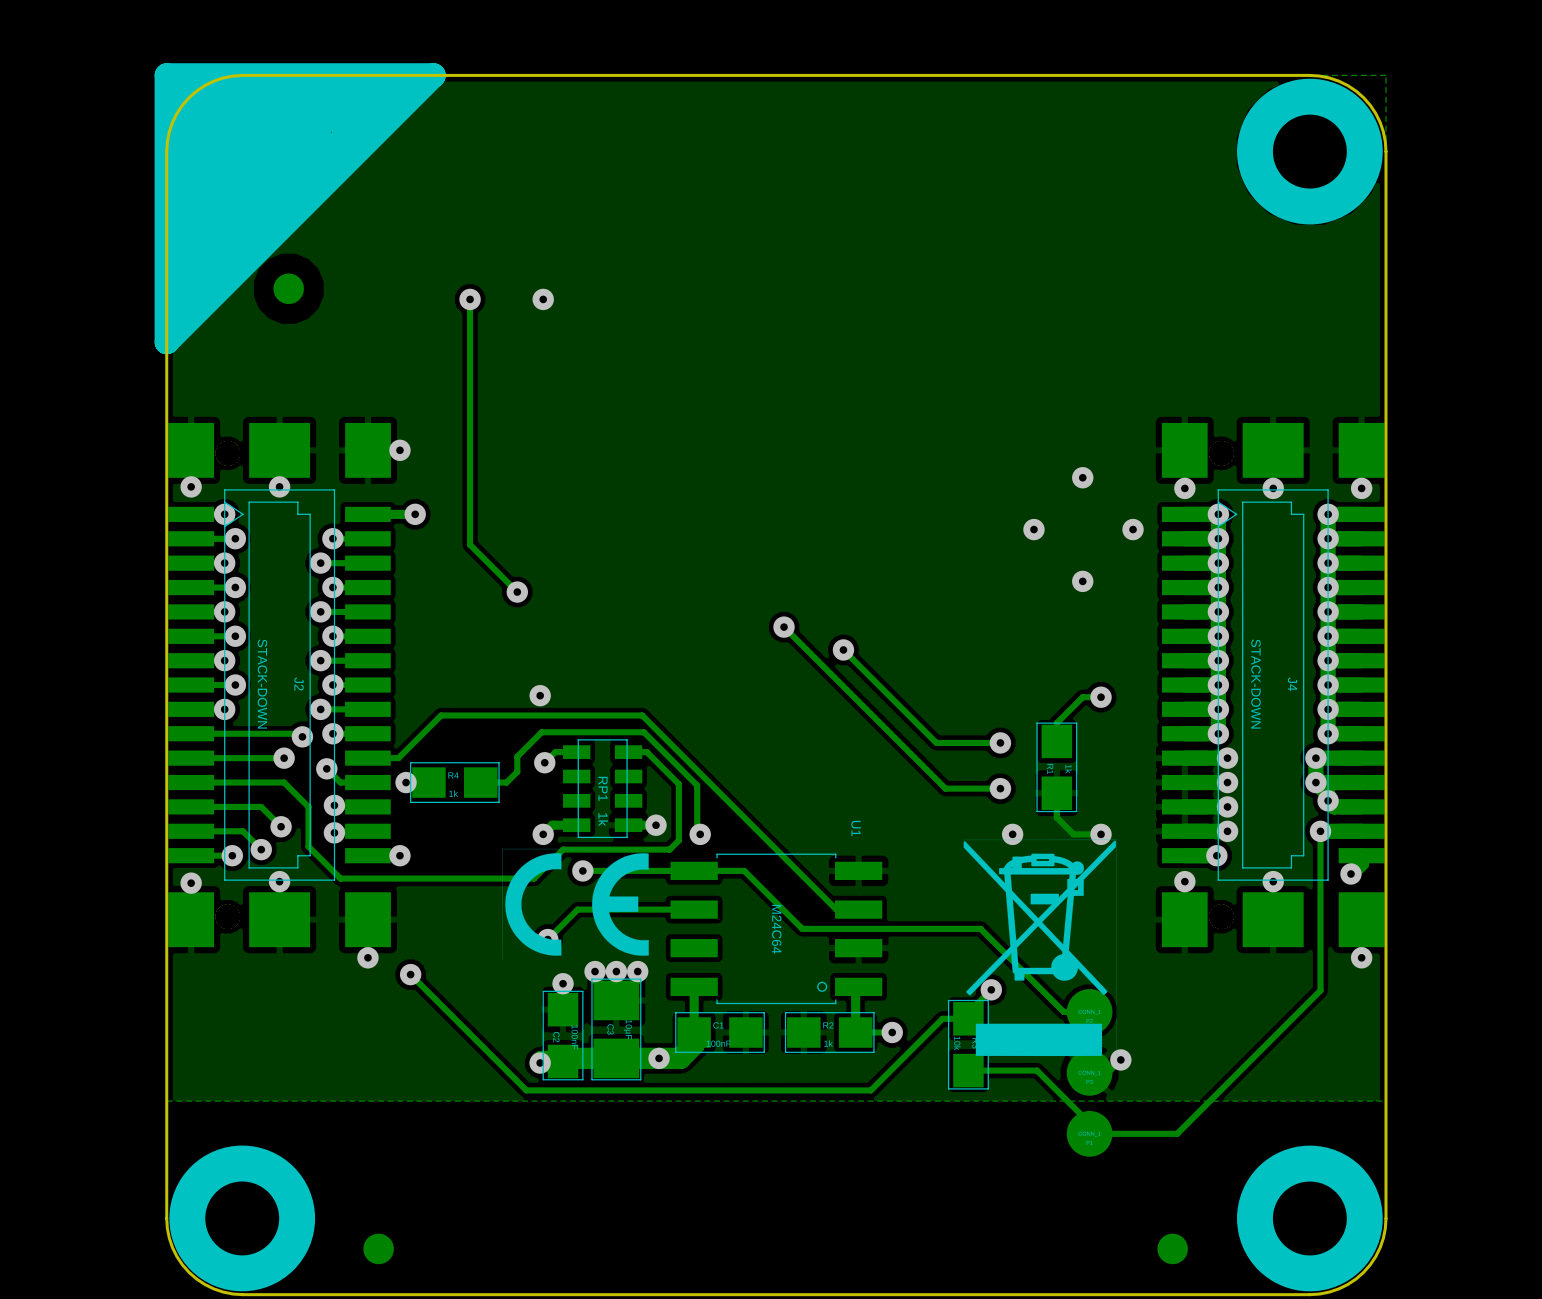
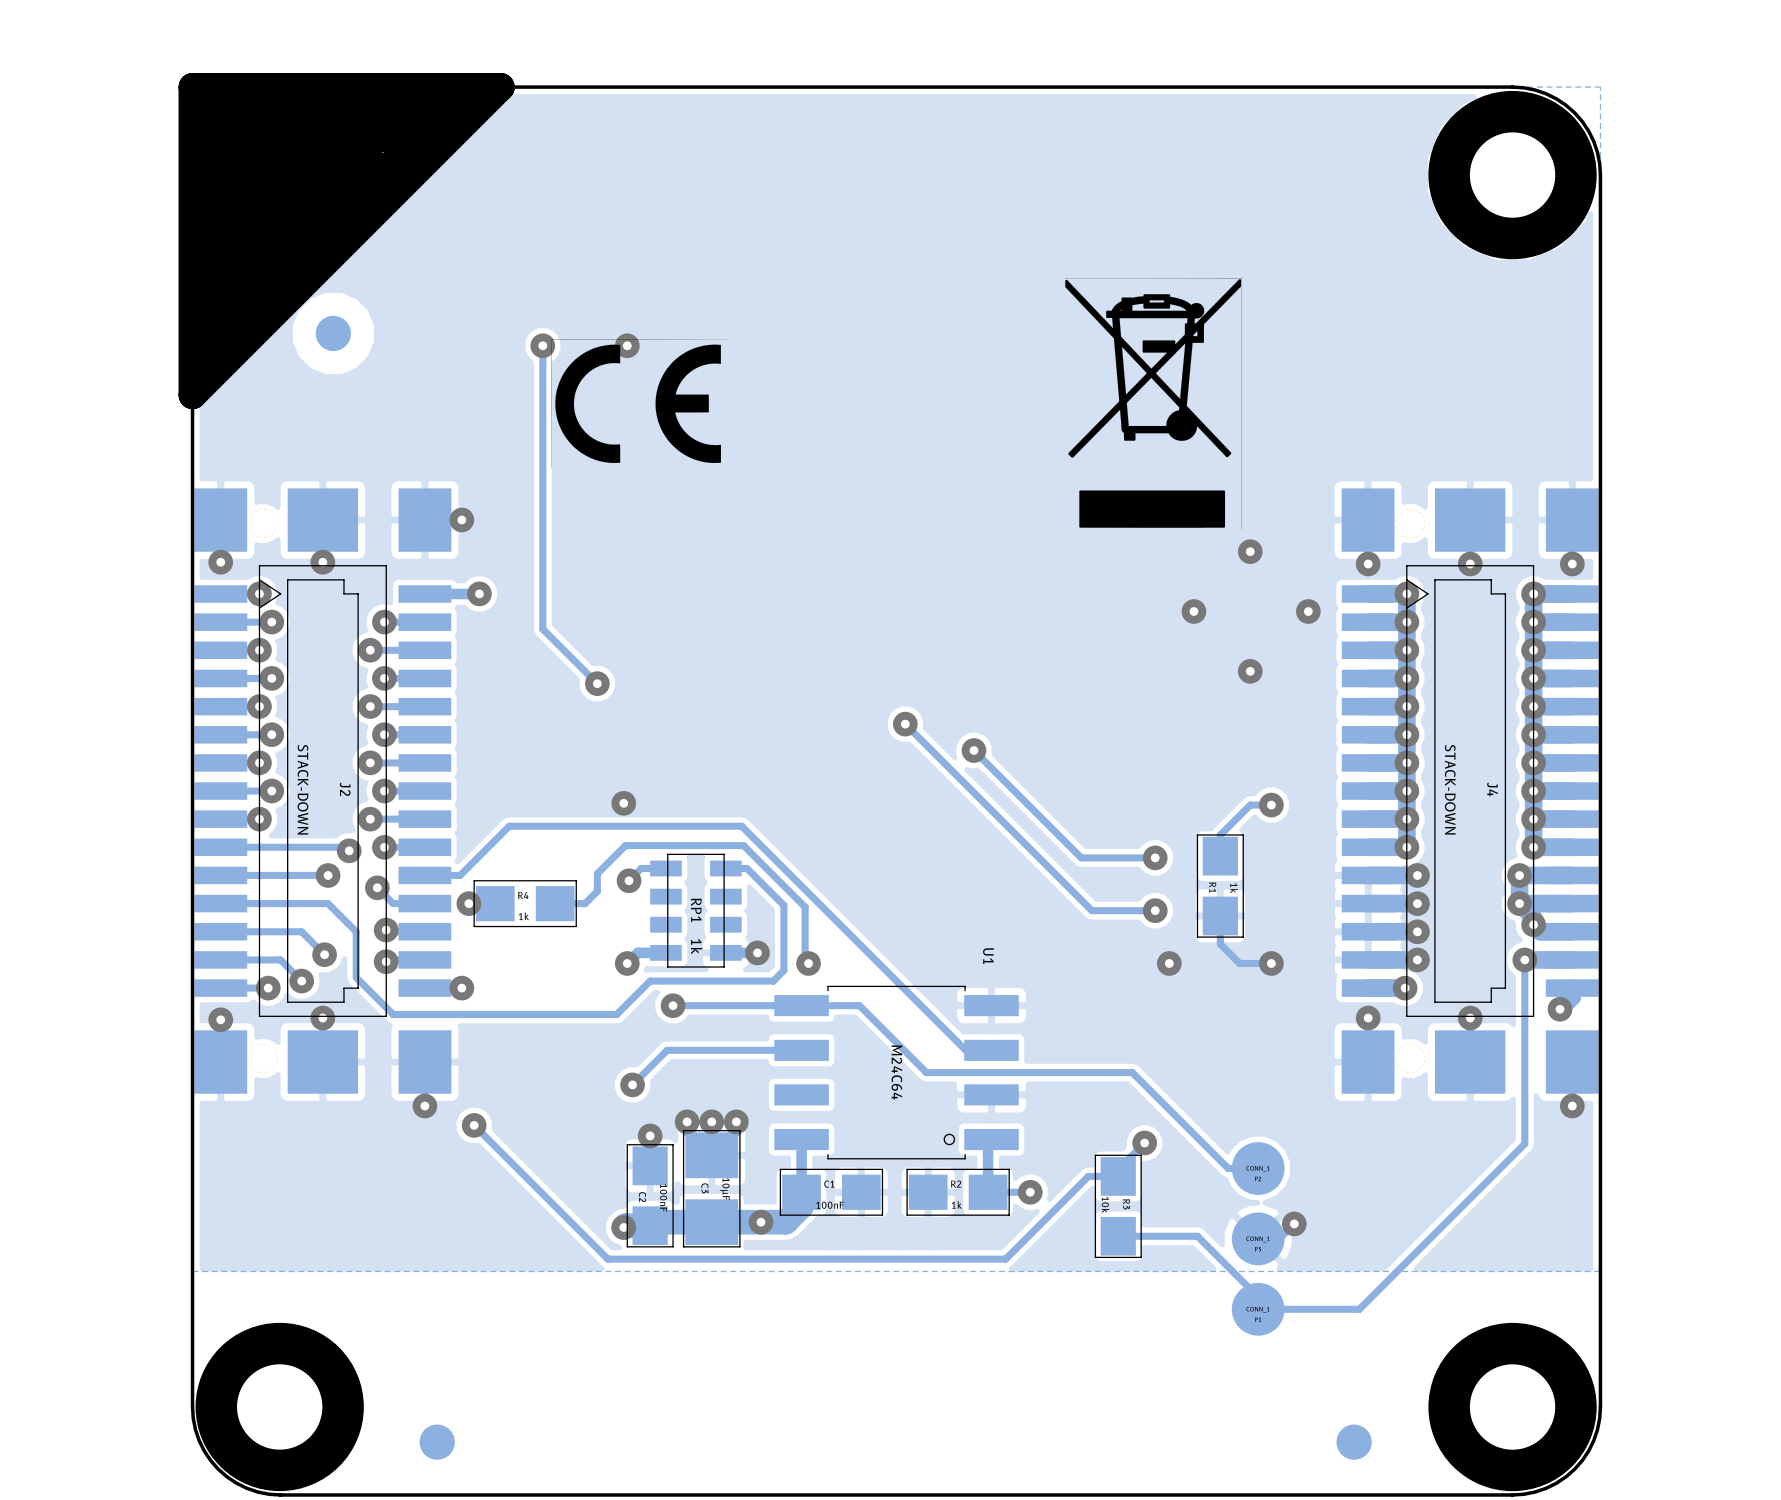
drawing position: (578, 904) -> (639, 403)
drawing position: (1040, 948) -> (1153, 403)

